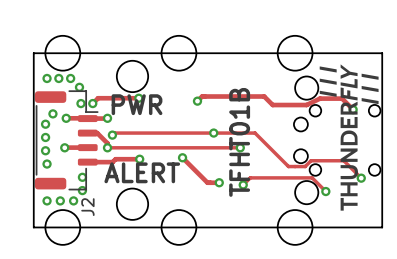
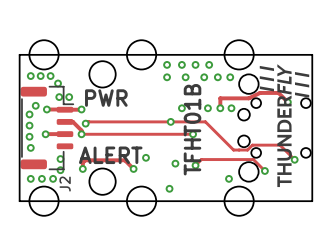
via: none -> (167, 64)
via: none -> (181, 64)
via: none -> (195, 64)
via: none -> (209, 64)
via: none -> (167, 77)
via: none -> (185, 77)
via: none -> (204, 77)
via: none -> (217, 77)
via: none -> (230, 77)
track: (138, 98) (98, 98) (92, 103) -> none
via: (138, 98) -> none
track: (197, 101) (202, 96) (264, 96) (272, 105) -> (220, 108) (220, 98)
via: (197, 101) -> none
via: none -> (181, 108)
via: none -> (207, 108)
via: none -> (220, 108)
via: none -> (231, 108)
track: (182, 157) (207, 182) (219, 182) -> none
via: (182, 157) -> none
track: (139, 159) (87, 162) -> none
via: (139, 159) -> none
via: none -> (145, 157)
track: none -> (82, 168) (82, 162) (85, 160) (124, 160) (133, 168)
via: none -> (82, 168)
via: none -> (133, 168)
via: none -> (229, 178)
via: none -> (169, 188)

